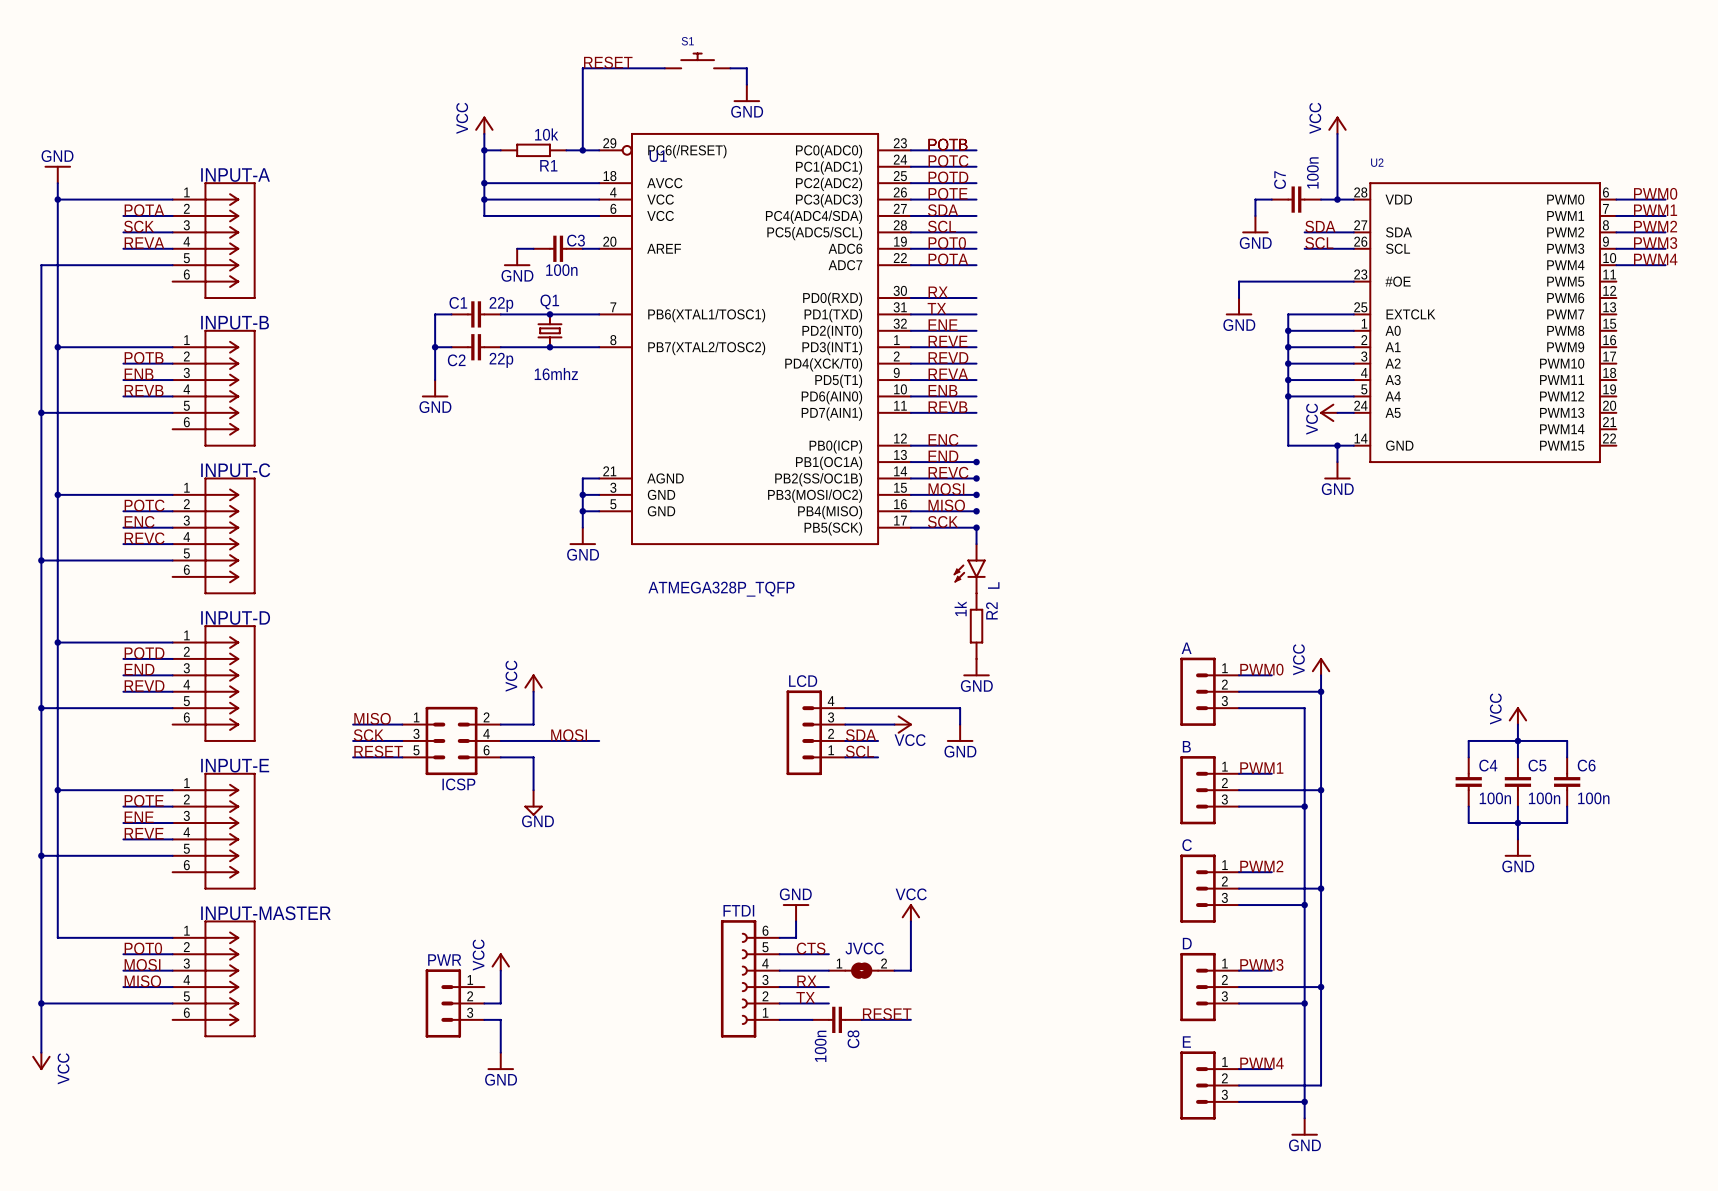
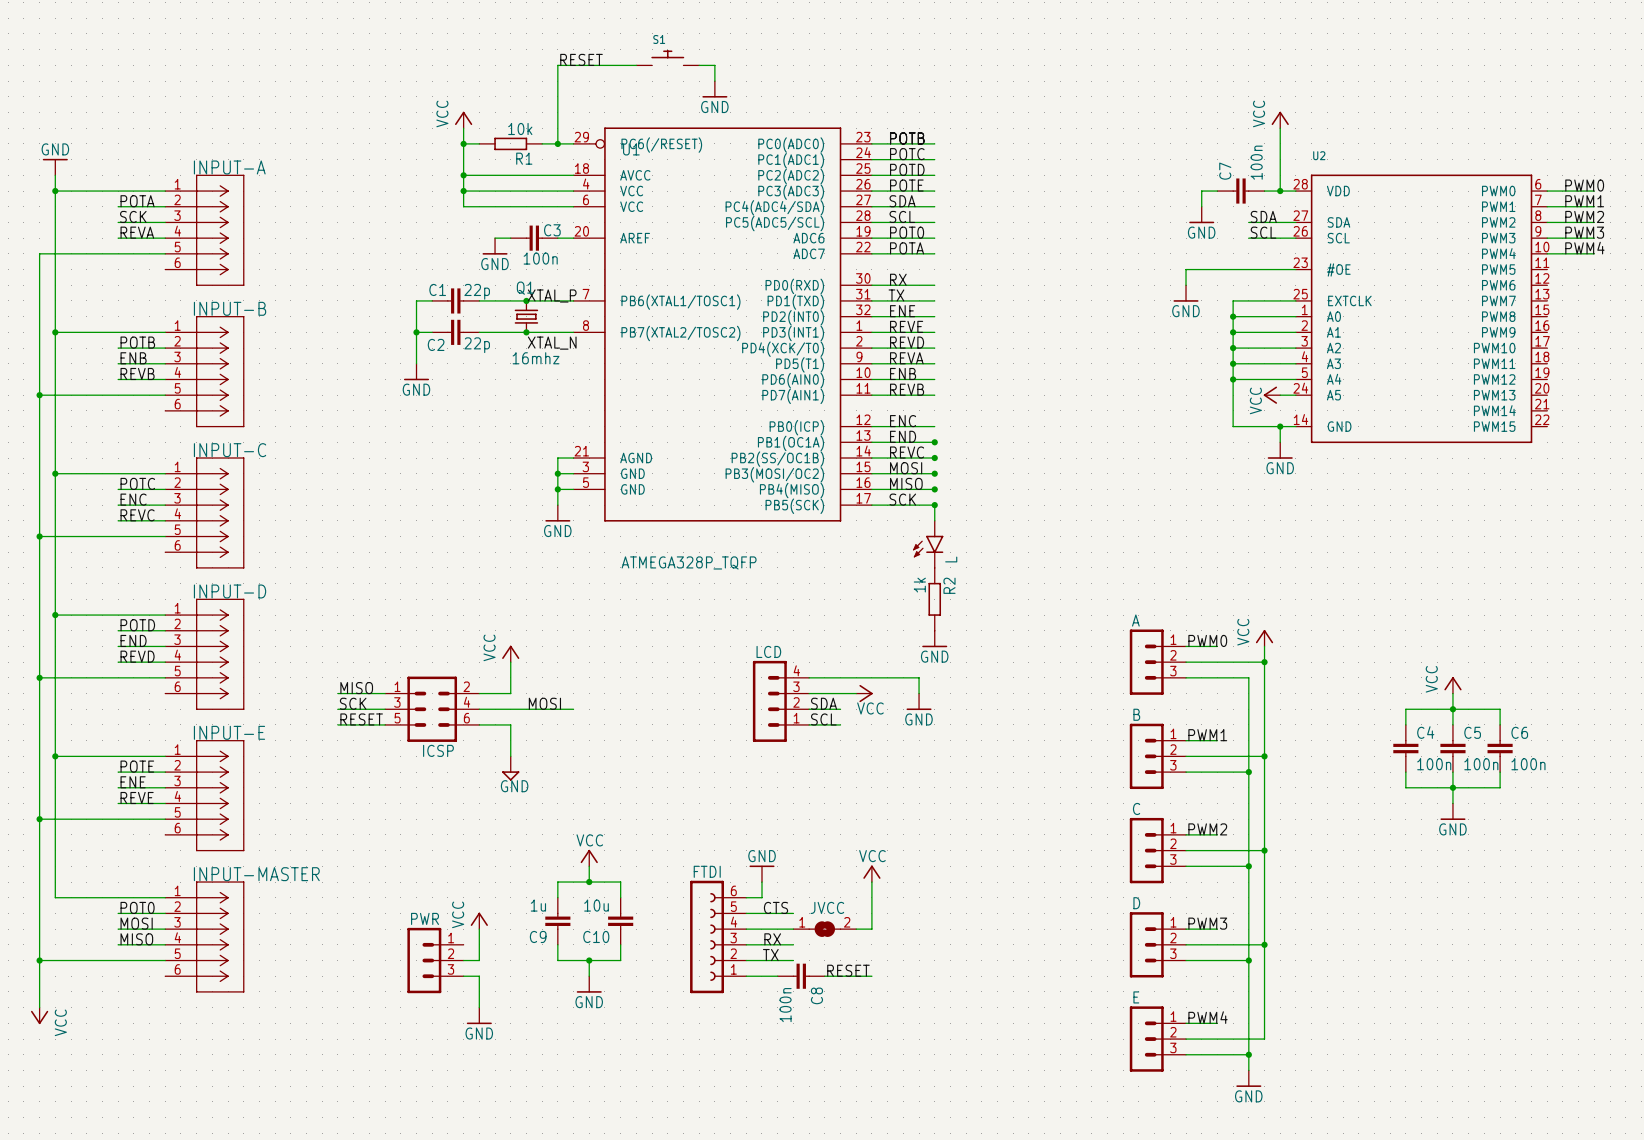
label: none -> XTAL_P (552, 295)
label: none -> XTAL_N (552, 343)
power symbol: none -> VCC (589, 858)
wire: none -> (589, 866) (589, 882)
junction: none -> (589, 882)
wire: none -> (557, 897) (557, 882) (620, 882) (620, 897)
C9: none -> 1u (557, 921)
C10: none -> 10u (620, 921)
wire: none -> (557, 944) (557, 960) (620, 960) (620, 944)
wire: none -> (589, 960) (589, 976)
junction: none -> (589, 960)
power symbol: none -> GND (589, 984)

